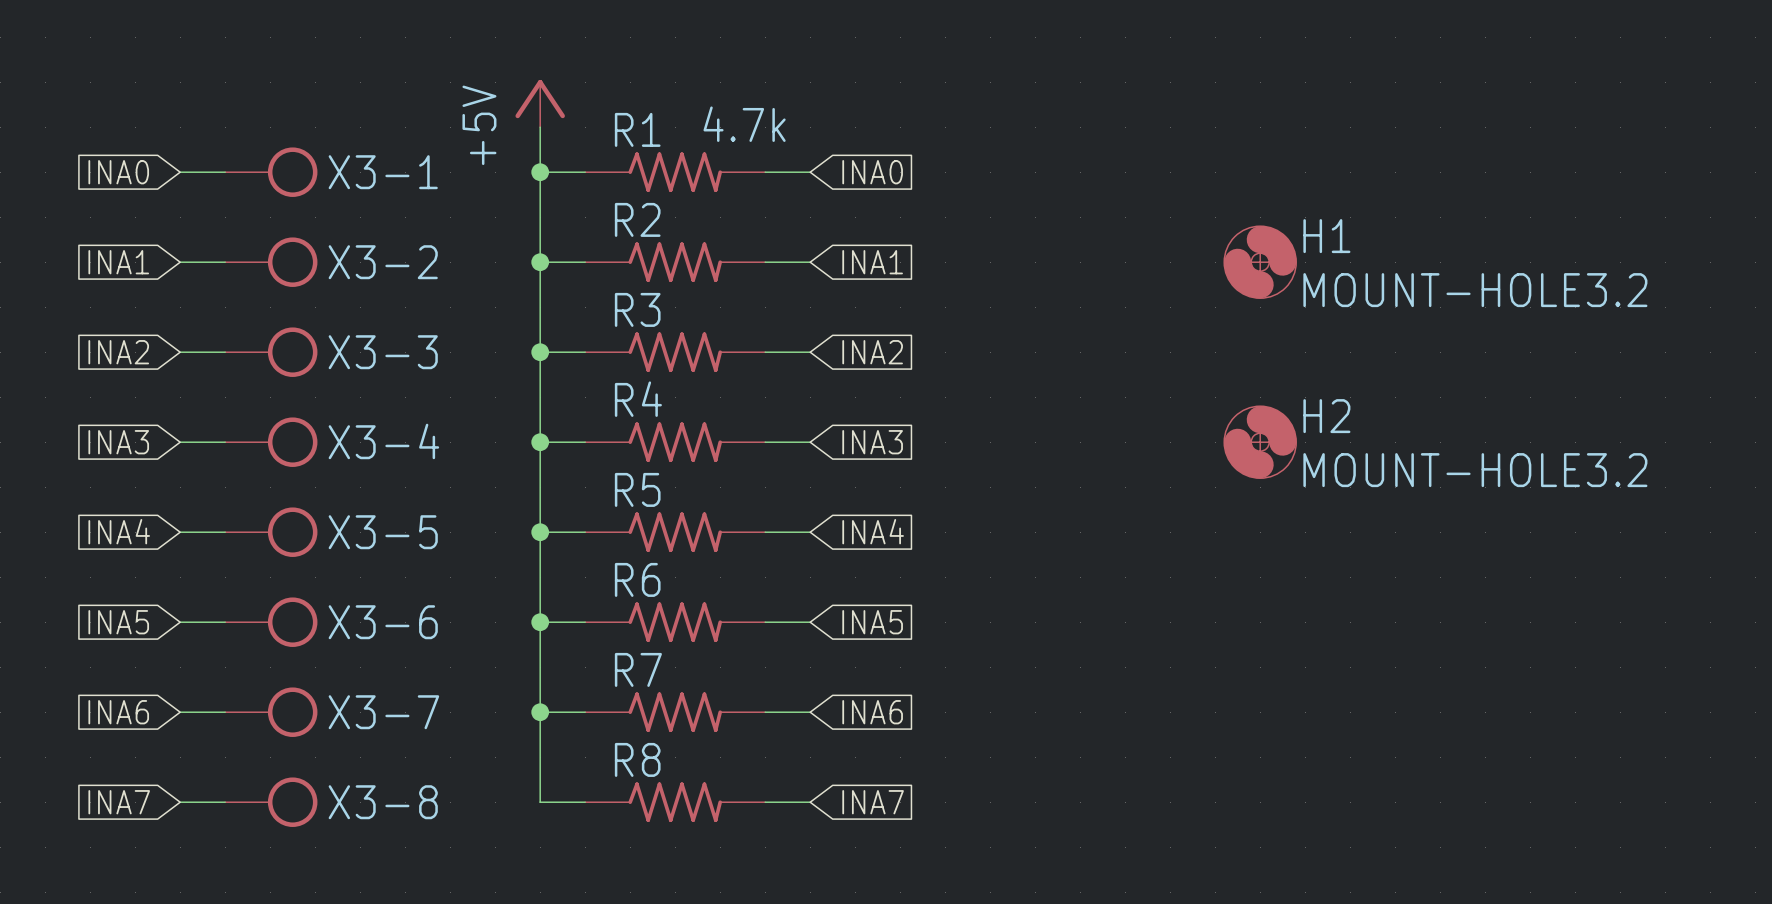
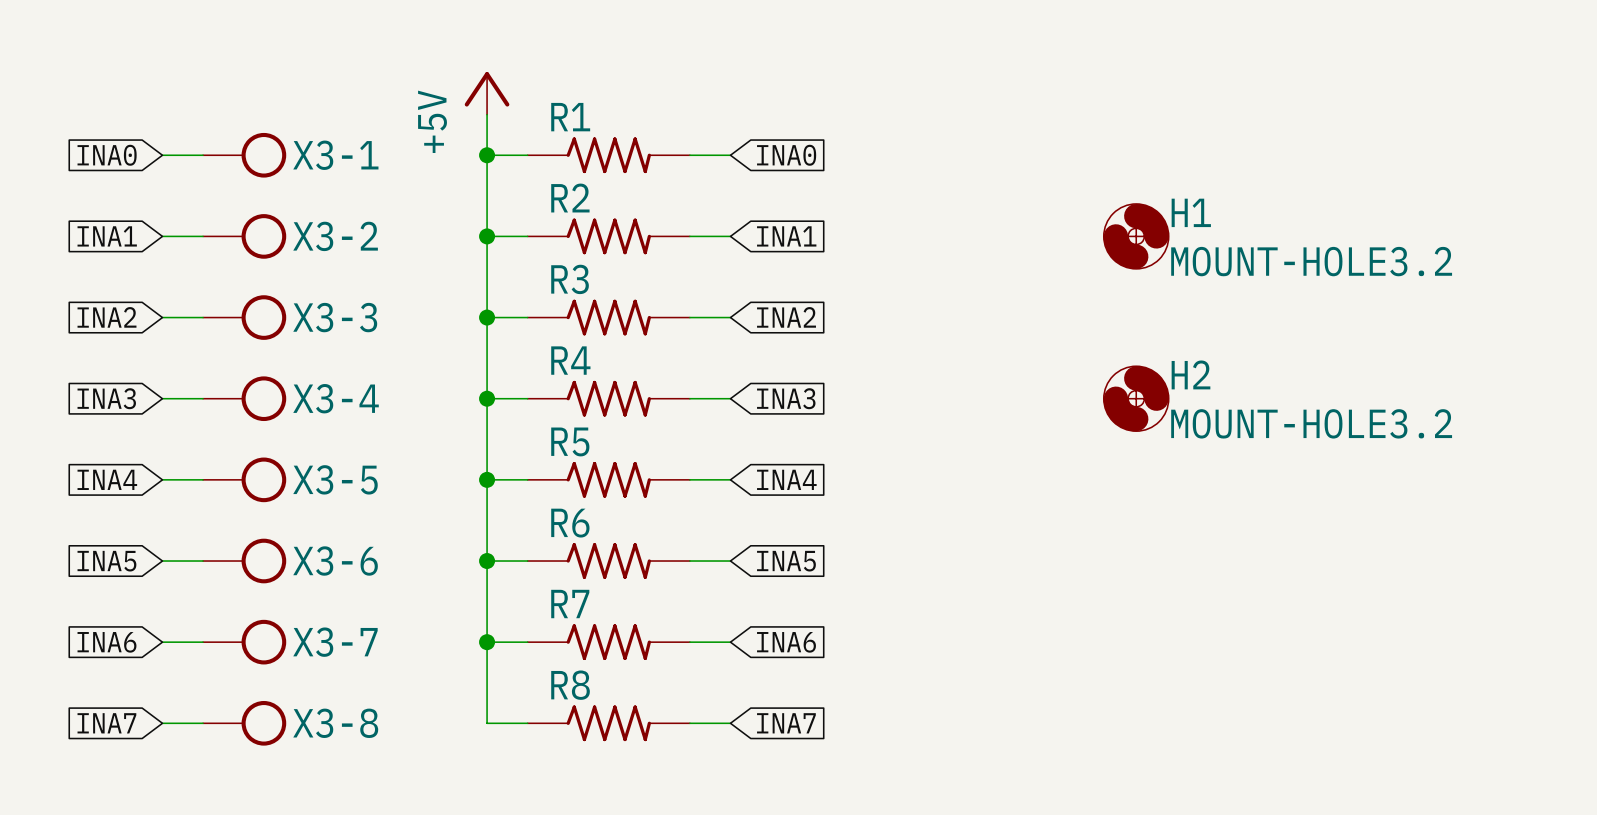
R1 value: 4.7k (744, 124) -> none

